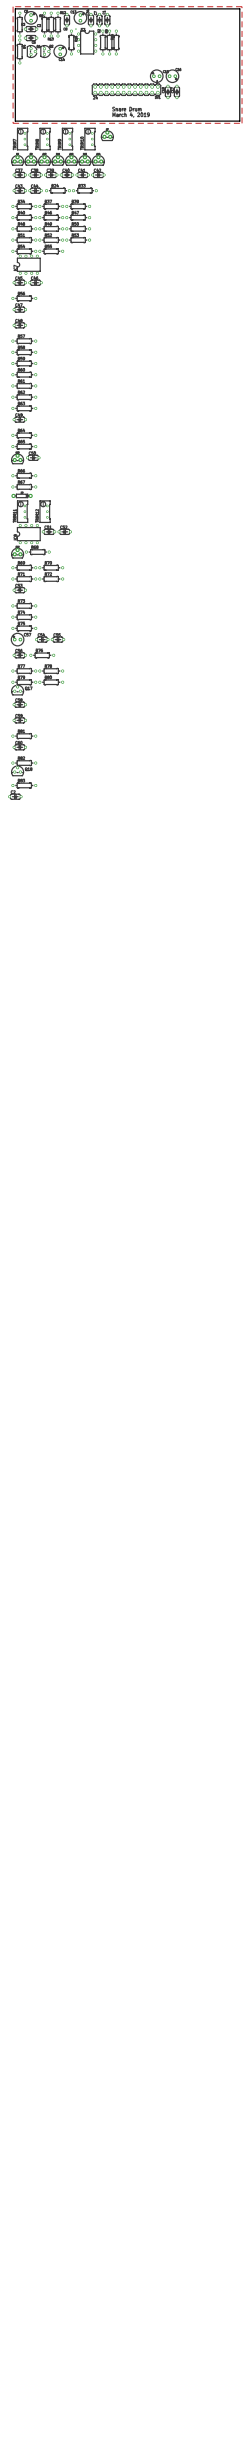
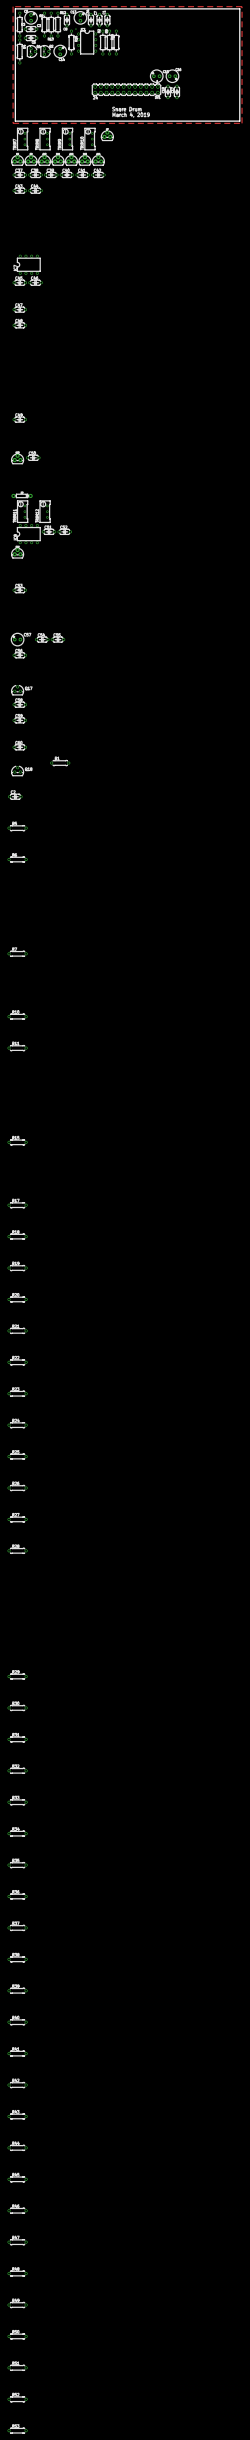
part footprint: [45, 187, 71, 194] -> [7, 1422, 28, 1428]
part footprint: [72, 187, 98, 194] -> [7, 1799, 28, 1805]
part footprint: [11, 203, 38, 210] -> [7, 1830, 28, 1837]
part footprint: [38, 203, 65, 210] -> [7, 1925, 28, 1931]
part footprint: [65, 203, 92, 210] -> [7, 1988, 28, 1994]
part footprint: [11, 214, 38, 221] -> [7, 2019, 28, 2025]
part footprint: [38, 214, 65, 221] -> [7, 2208, 28, 2214]
part footprint: [65, 214, 92, 221] -> [7, 2239, 28, 2245]
part footprint: [11, 226, 38, 232] -> [7, 2270, 28, 2277]
part footprint: [38, 226, 65, 232] -> [7, 2302, 28, 2308]
part footprint: [65, 226, 92, 232] -> [7, 2333, 28, 2340]
part footprint: [11, 237, 38, 243] -> [7, 2365, 28, 2371]
part footprint: [38, 237, 65, 243] -> [7, 2396, 28, 2403]
part footprint: [65, 237, 92, 243] -> [7, 2427, 28, 2434]
part: (24, 251) -> none
part: (51, 251) -> none
part: (24, 298) -> none
part: (24, 341) -> none
part: (24, 352) -> none
part: (24, 363) -> none
part: (24, 374) -> none
part: (24, 385) -> none
part: (24, 397) -> none
part: (24, 408) -> none
part: (24, 435) -> none
part: (24, 446) -> none
part: (24, 475) -> none
part: (24, 486) -> none
part: (37, 552) -> none
part: (24, 567) -> none
part: (51, 567) -> none
part: (24, 578) -> none
part: (51, 578) -> none
part: (24, 605) -> none
part: (24, 617) -> none
part: (24, 628) -> none
part: (42, 655) -> none
part: (24, 671) -> none
part: (51, 671) -> none
part: (24, 682) -> none
part: (51, 682) -> none
part: (24, 736) -> none
part: (24, 763) -> none
part: none -> (60, 763)
part: (24, 785) -> none
part: none -> (17, 828)
part: none -> (17, 859)
part: none -> (17, 953)
part: none -> (17, 1016)
part: none -> (17, 1048)
part: none -> (17, 1142)
part: none -> (17, 1205)
part: none -> (17, 1236)
part: none -> (17, 1268)
part: none -> (17, 1299)
part: none -> (17, 1330)
part: none -> (17, 1362)
part: none -> (17, 1393)
part: none -> (17, 1456)
part: none -> (17, 1488)
part: none -> (17, 1519)
part: none -> (17, 1550)
part: none -> (17, 1676)
part: none -> (17, 1707)
part: none -> (17, 1739)
part: none -> (17, 1770)
part: none -> (17, 1865)
part: none -> (17, 1896)
part: none -> (17, 1959)
part: none -> (17, 2053)
part: none -> (17, 2085)
part: none -> (17, 2116)
part: none -> (17, 2147)
part: none -> (17, 2179)

